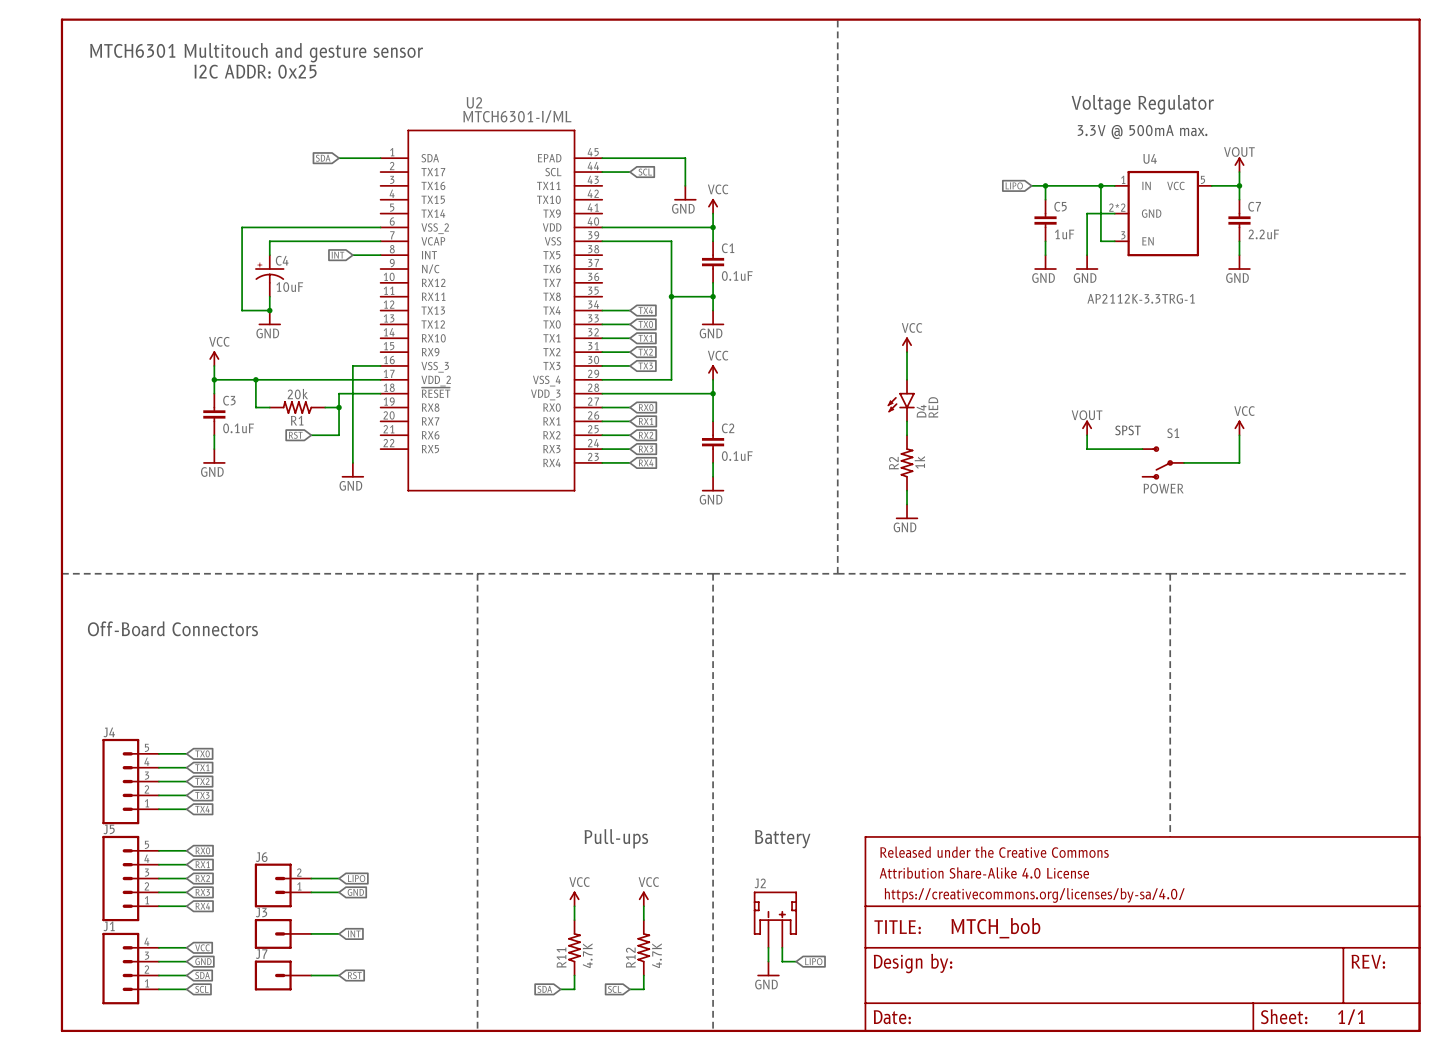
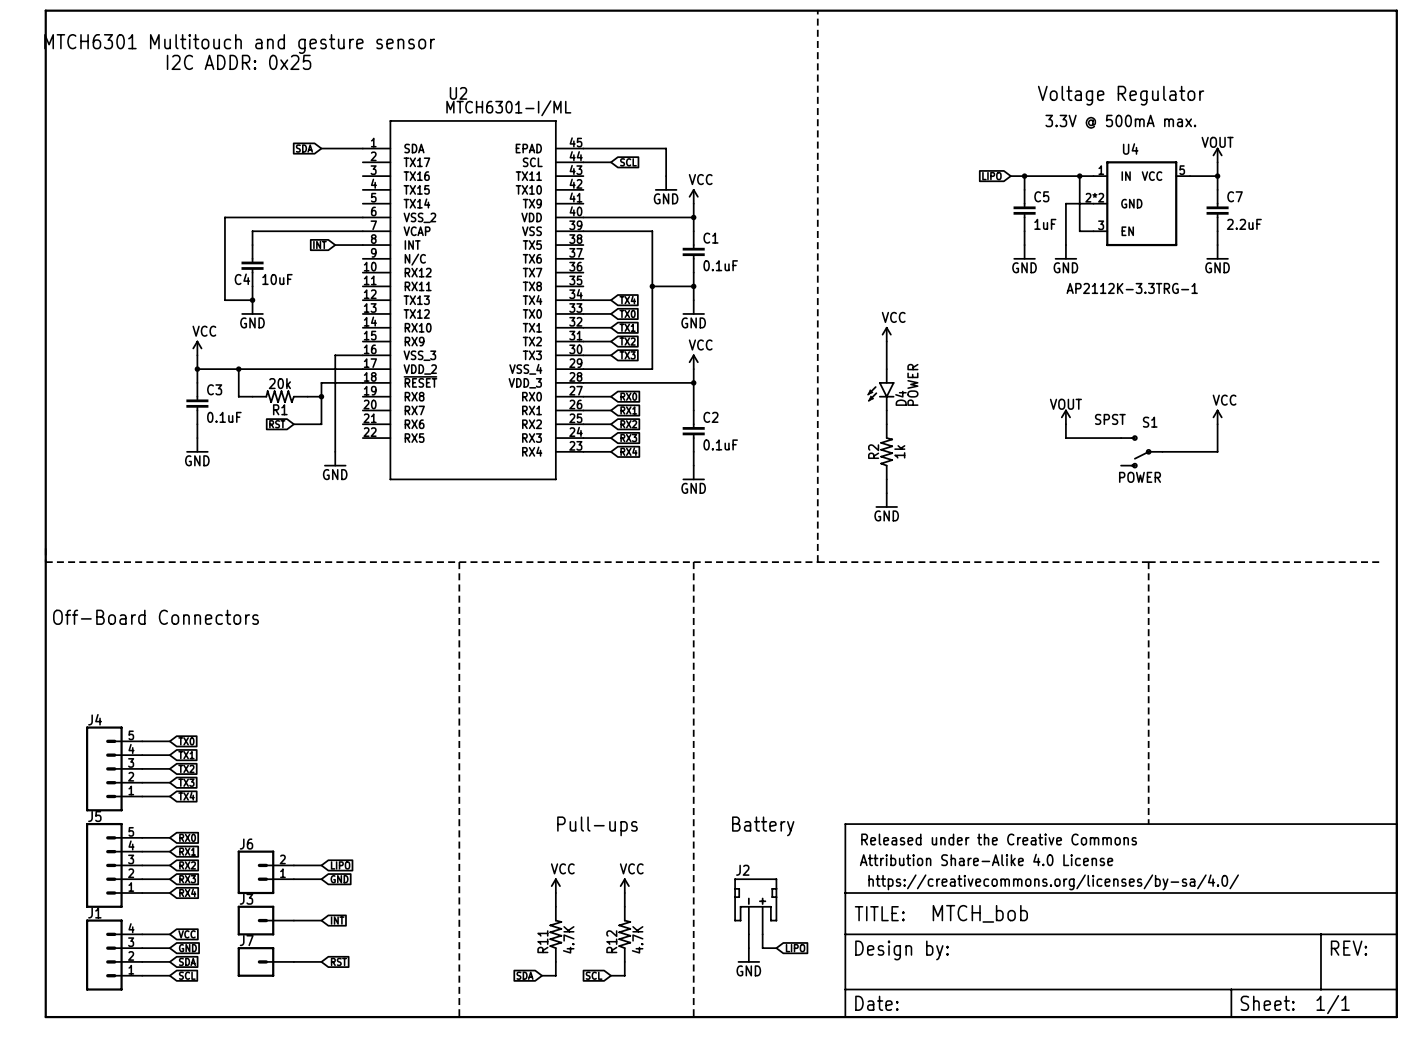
C4 symbol: [255, 255, 285, 297] -> [241, 245, 264, 287]
C4 name position: C4 (282, 260) -> C4 (242, 279)
D4 value: RED (933, 407) -> POWER (912, 384)

